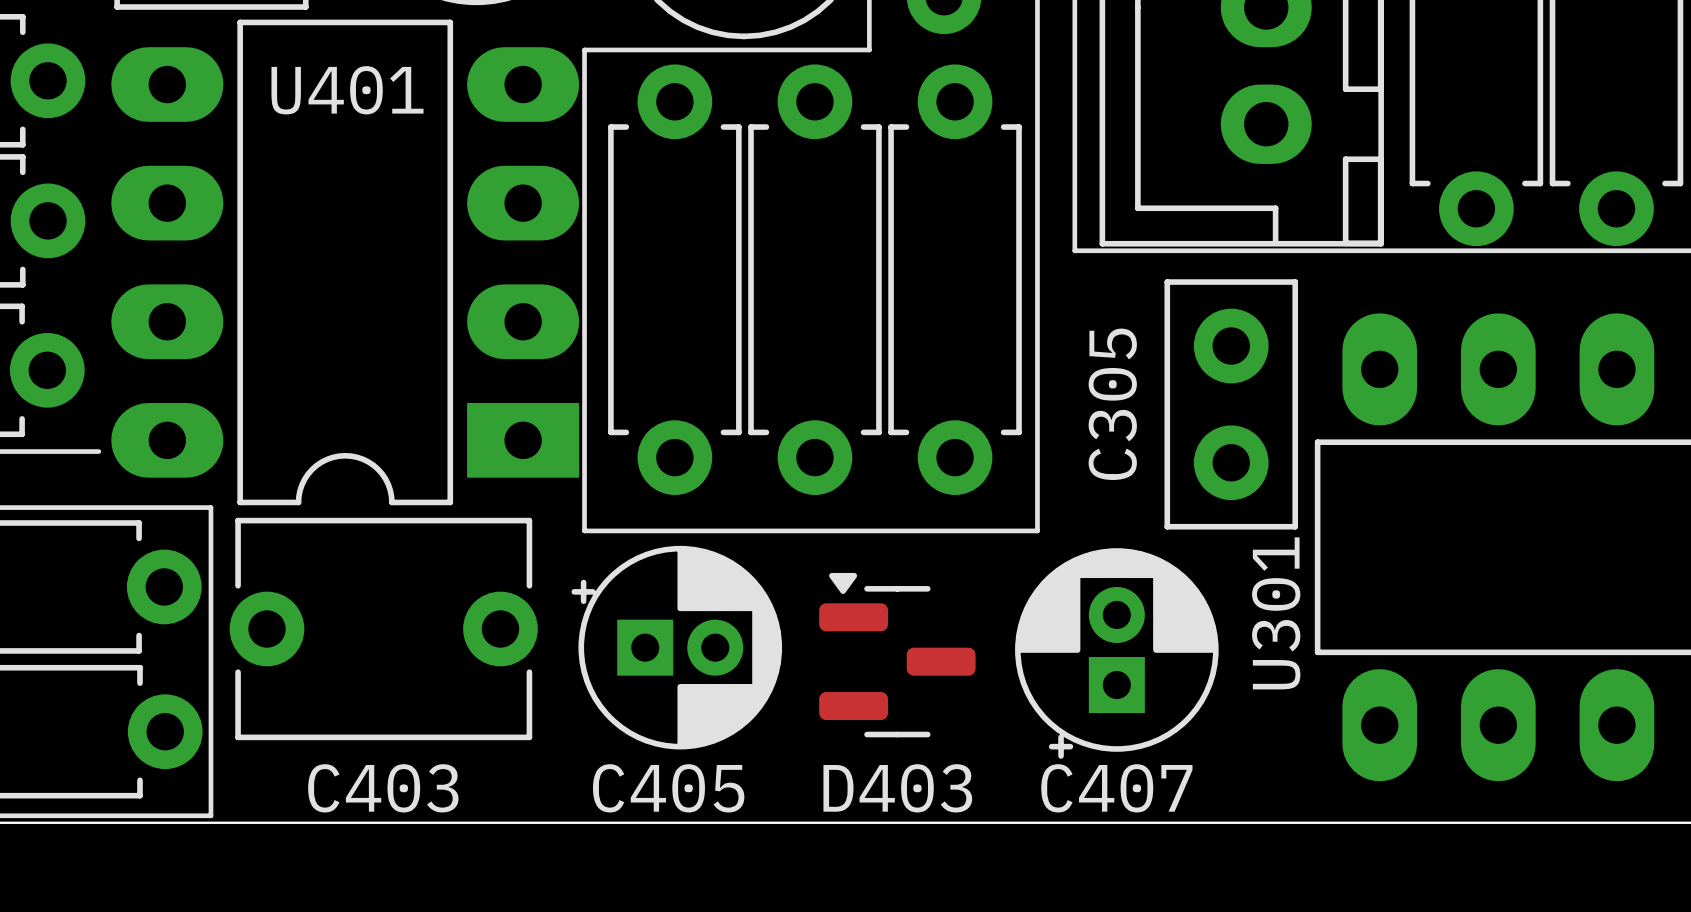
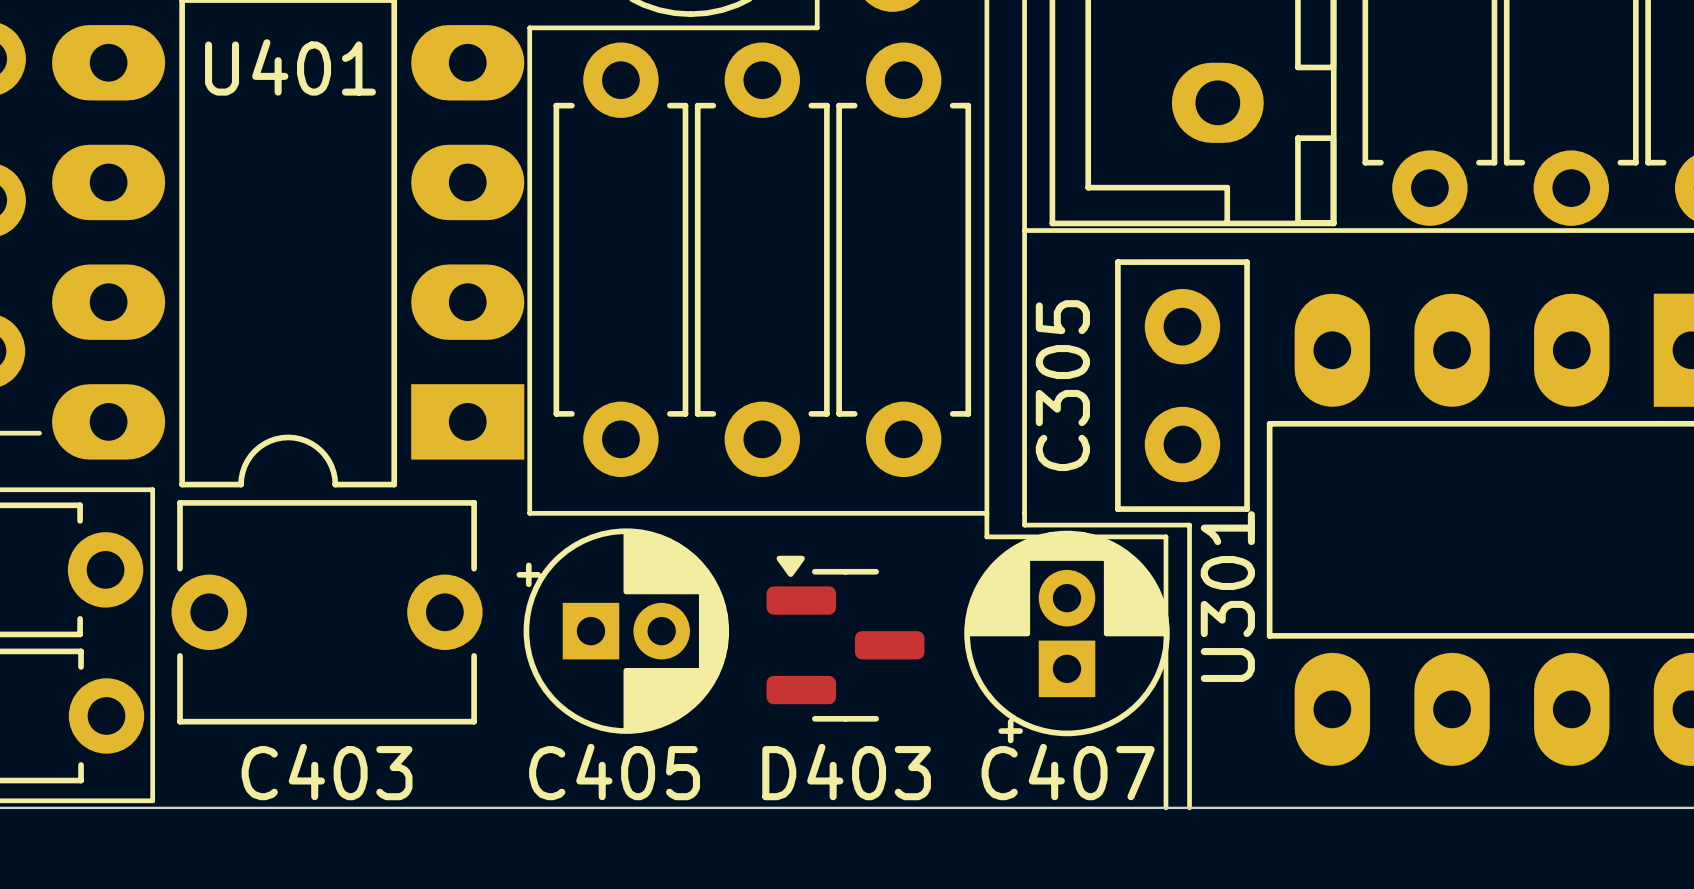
line: none -> (1024, 230) (1024, 525) (1189, 525) (1189, 807)
line: none -> (986, 513) (986, 536) (1165, 536) (1165, 807)

